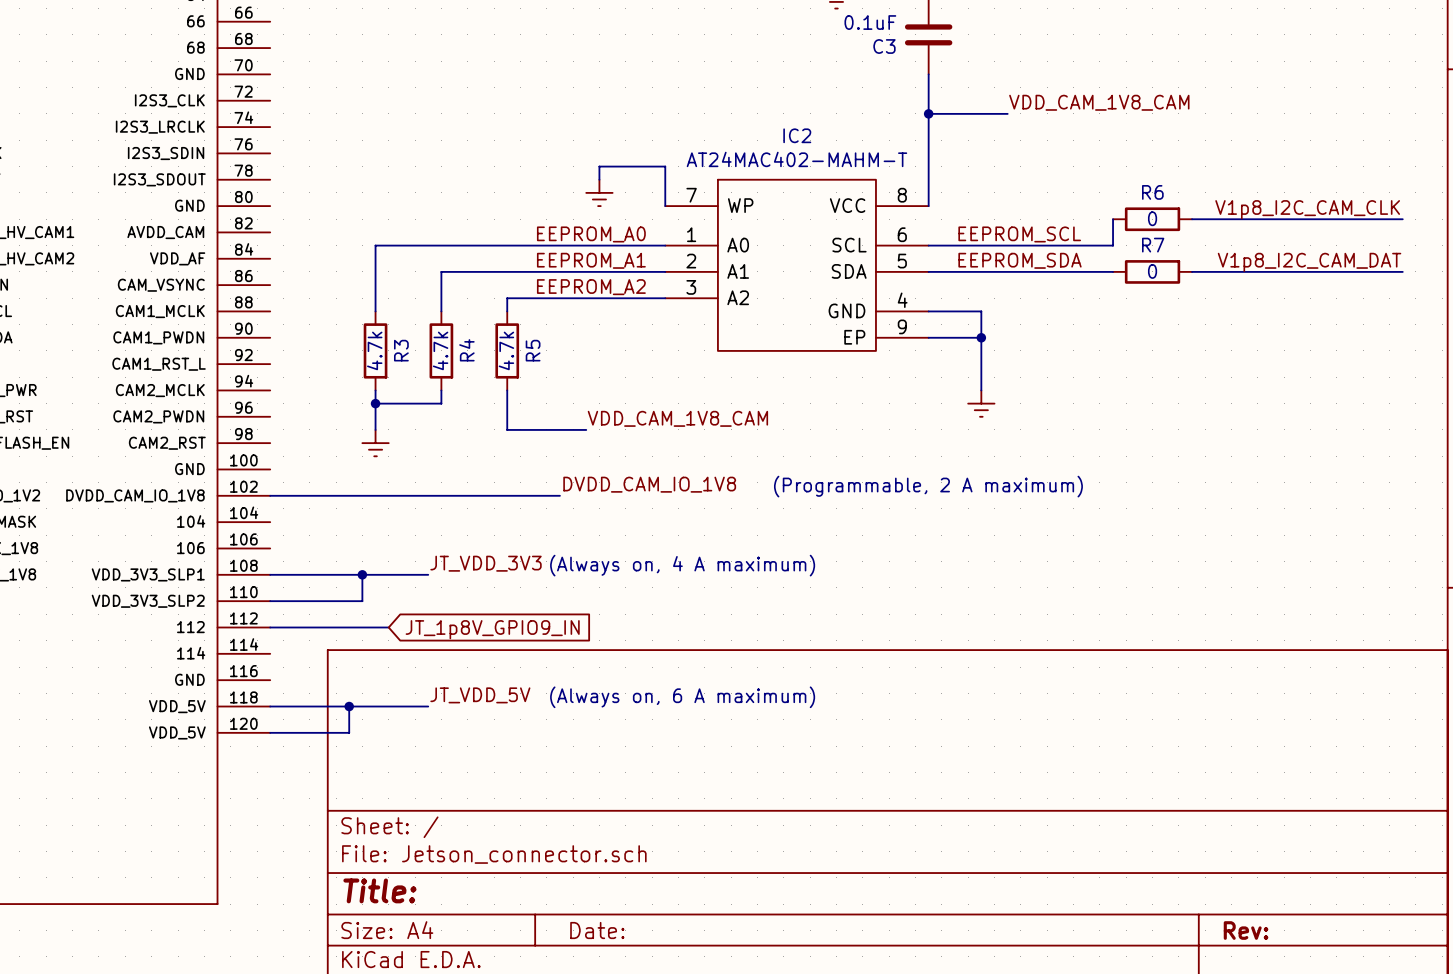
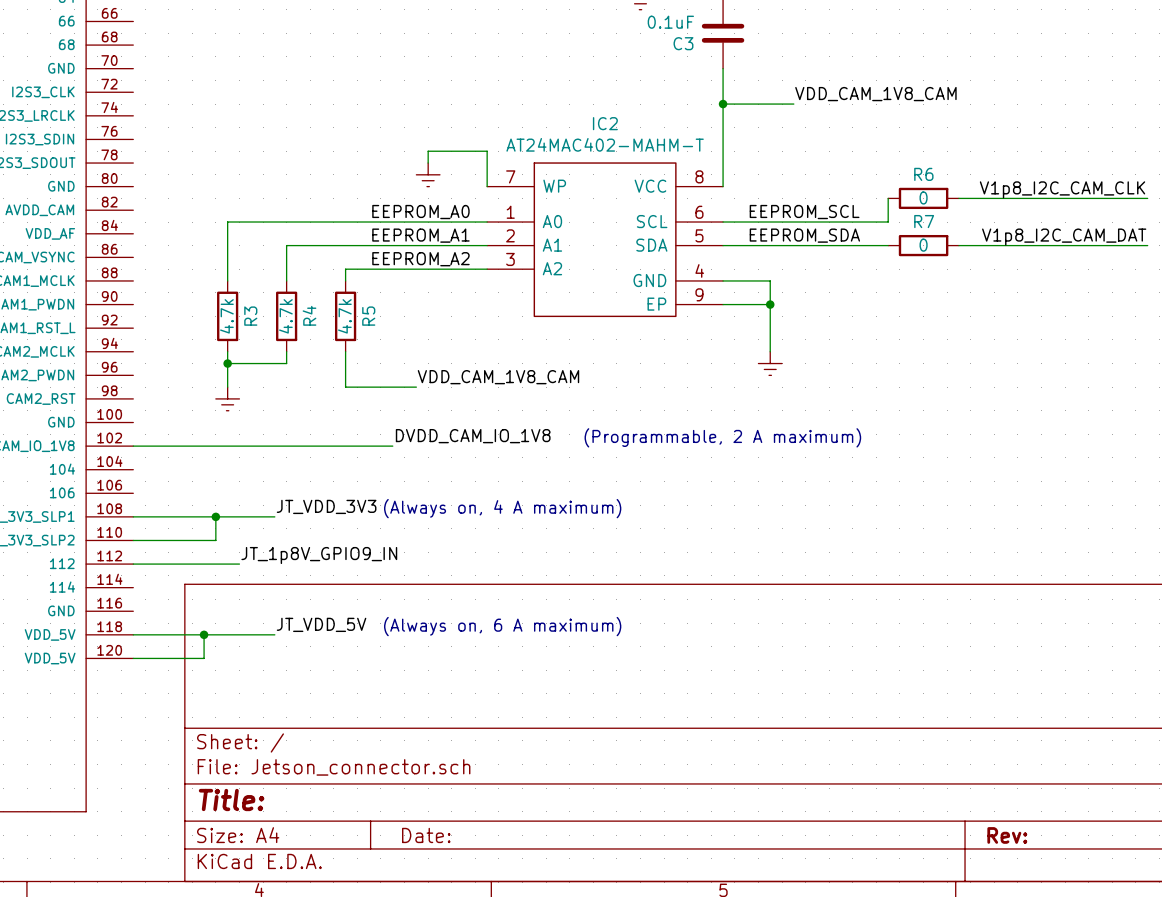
label: none -> JT_1p8V_GPIO9_IN (319, 555)
global label: JT_1p8V_GPIO9_IN (492, 629) -> none

